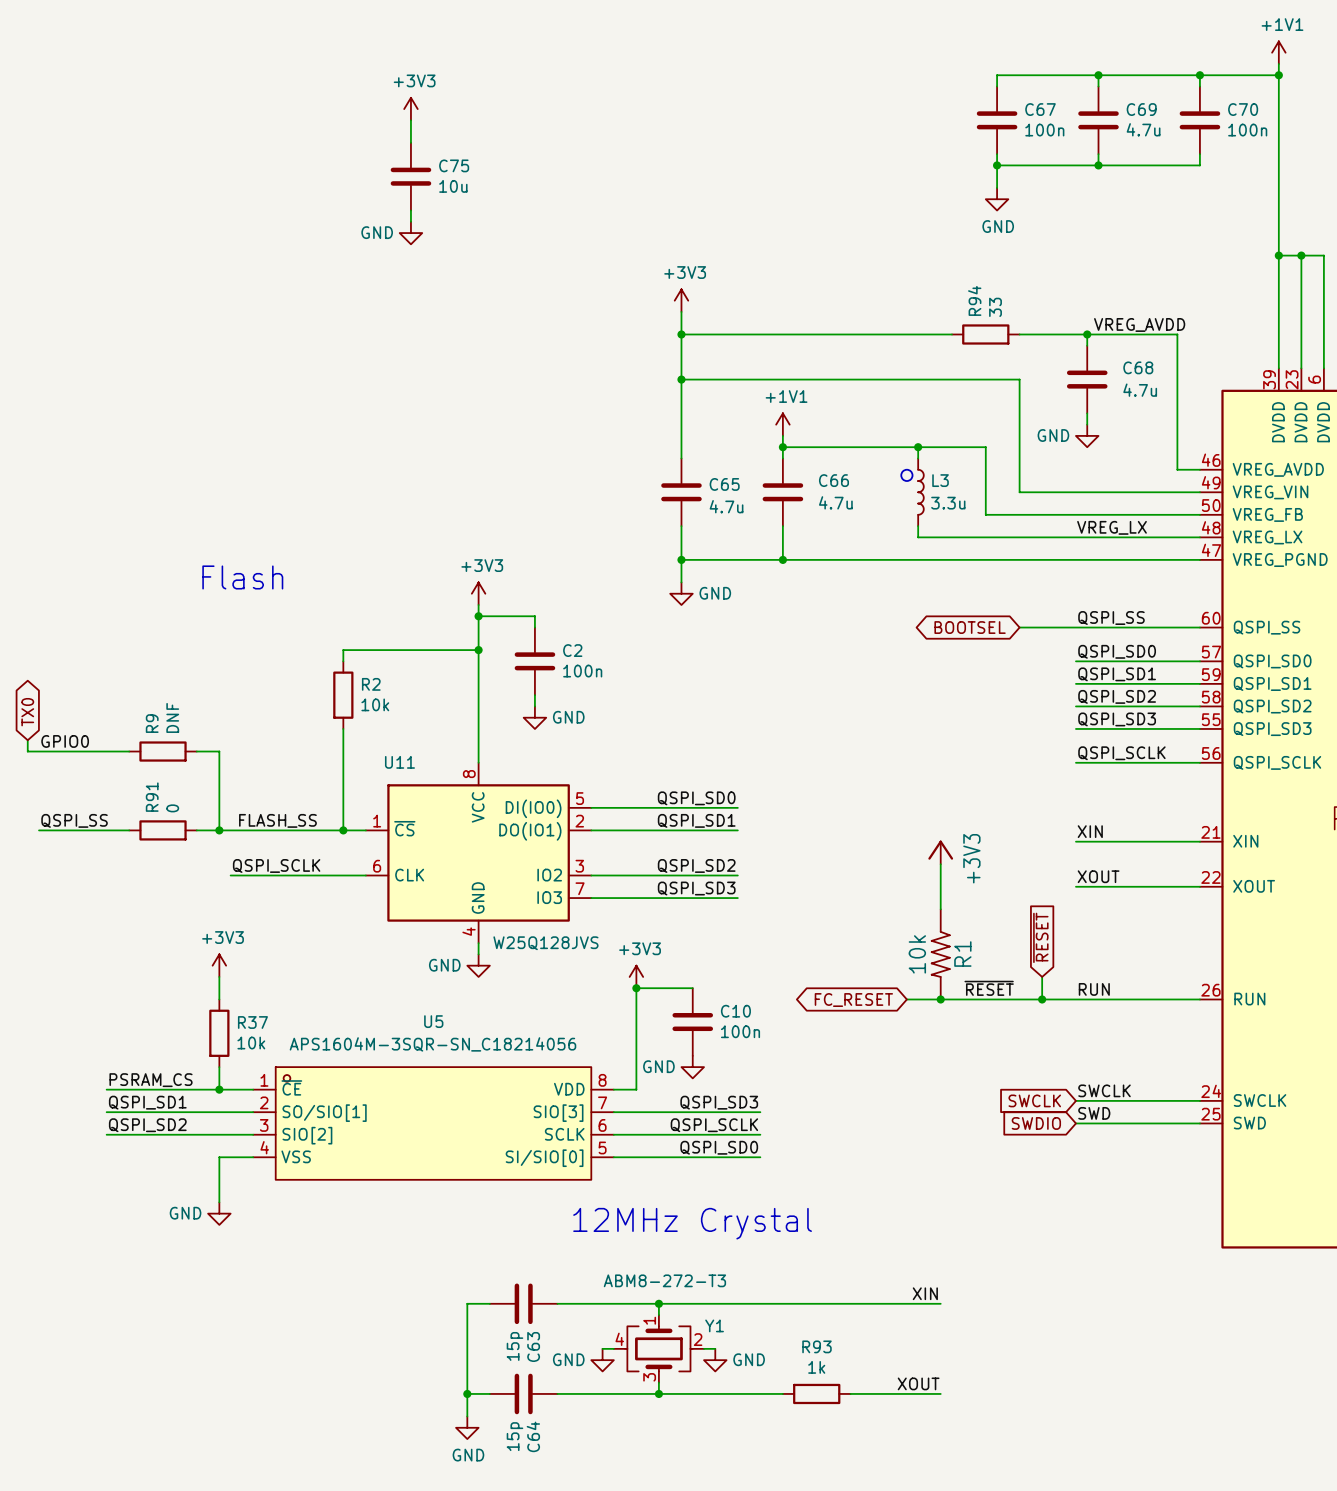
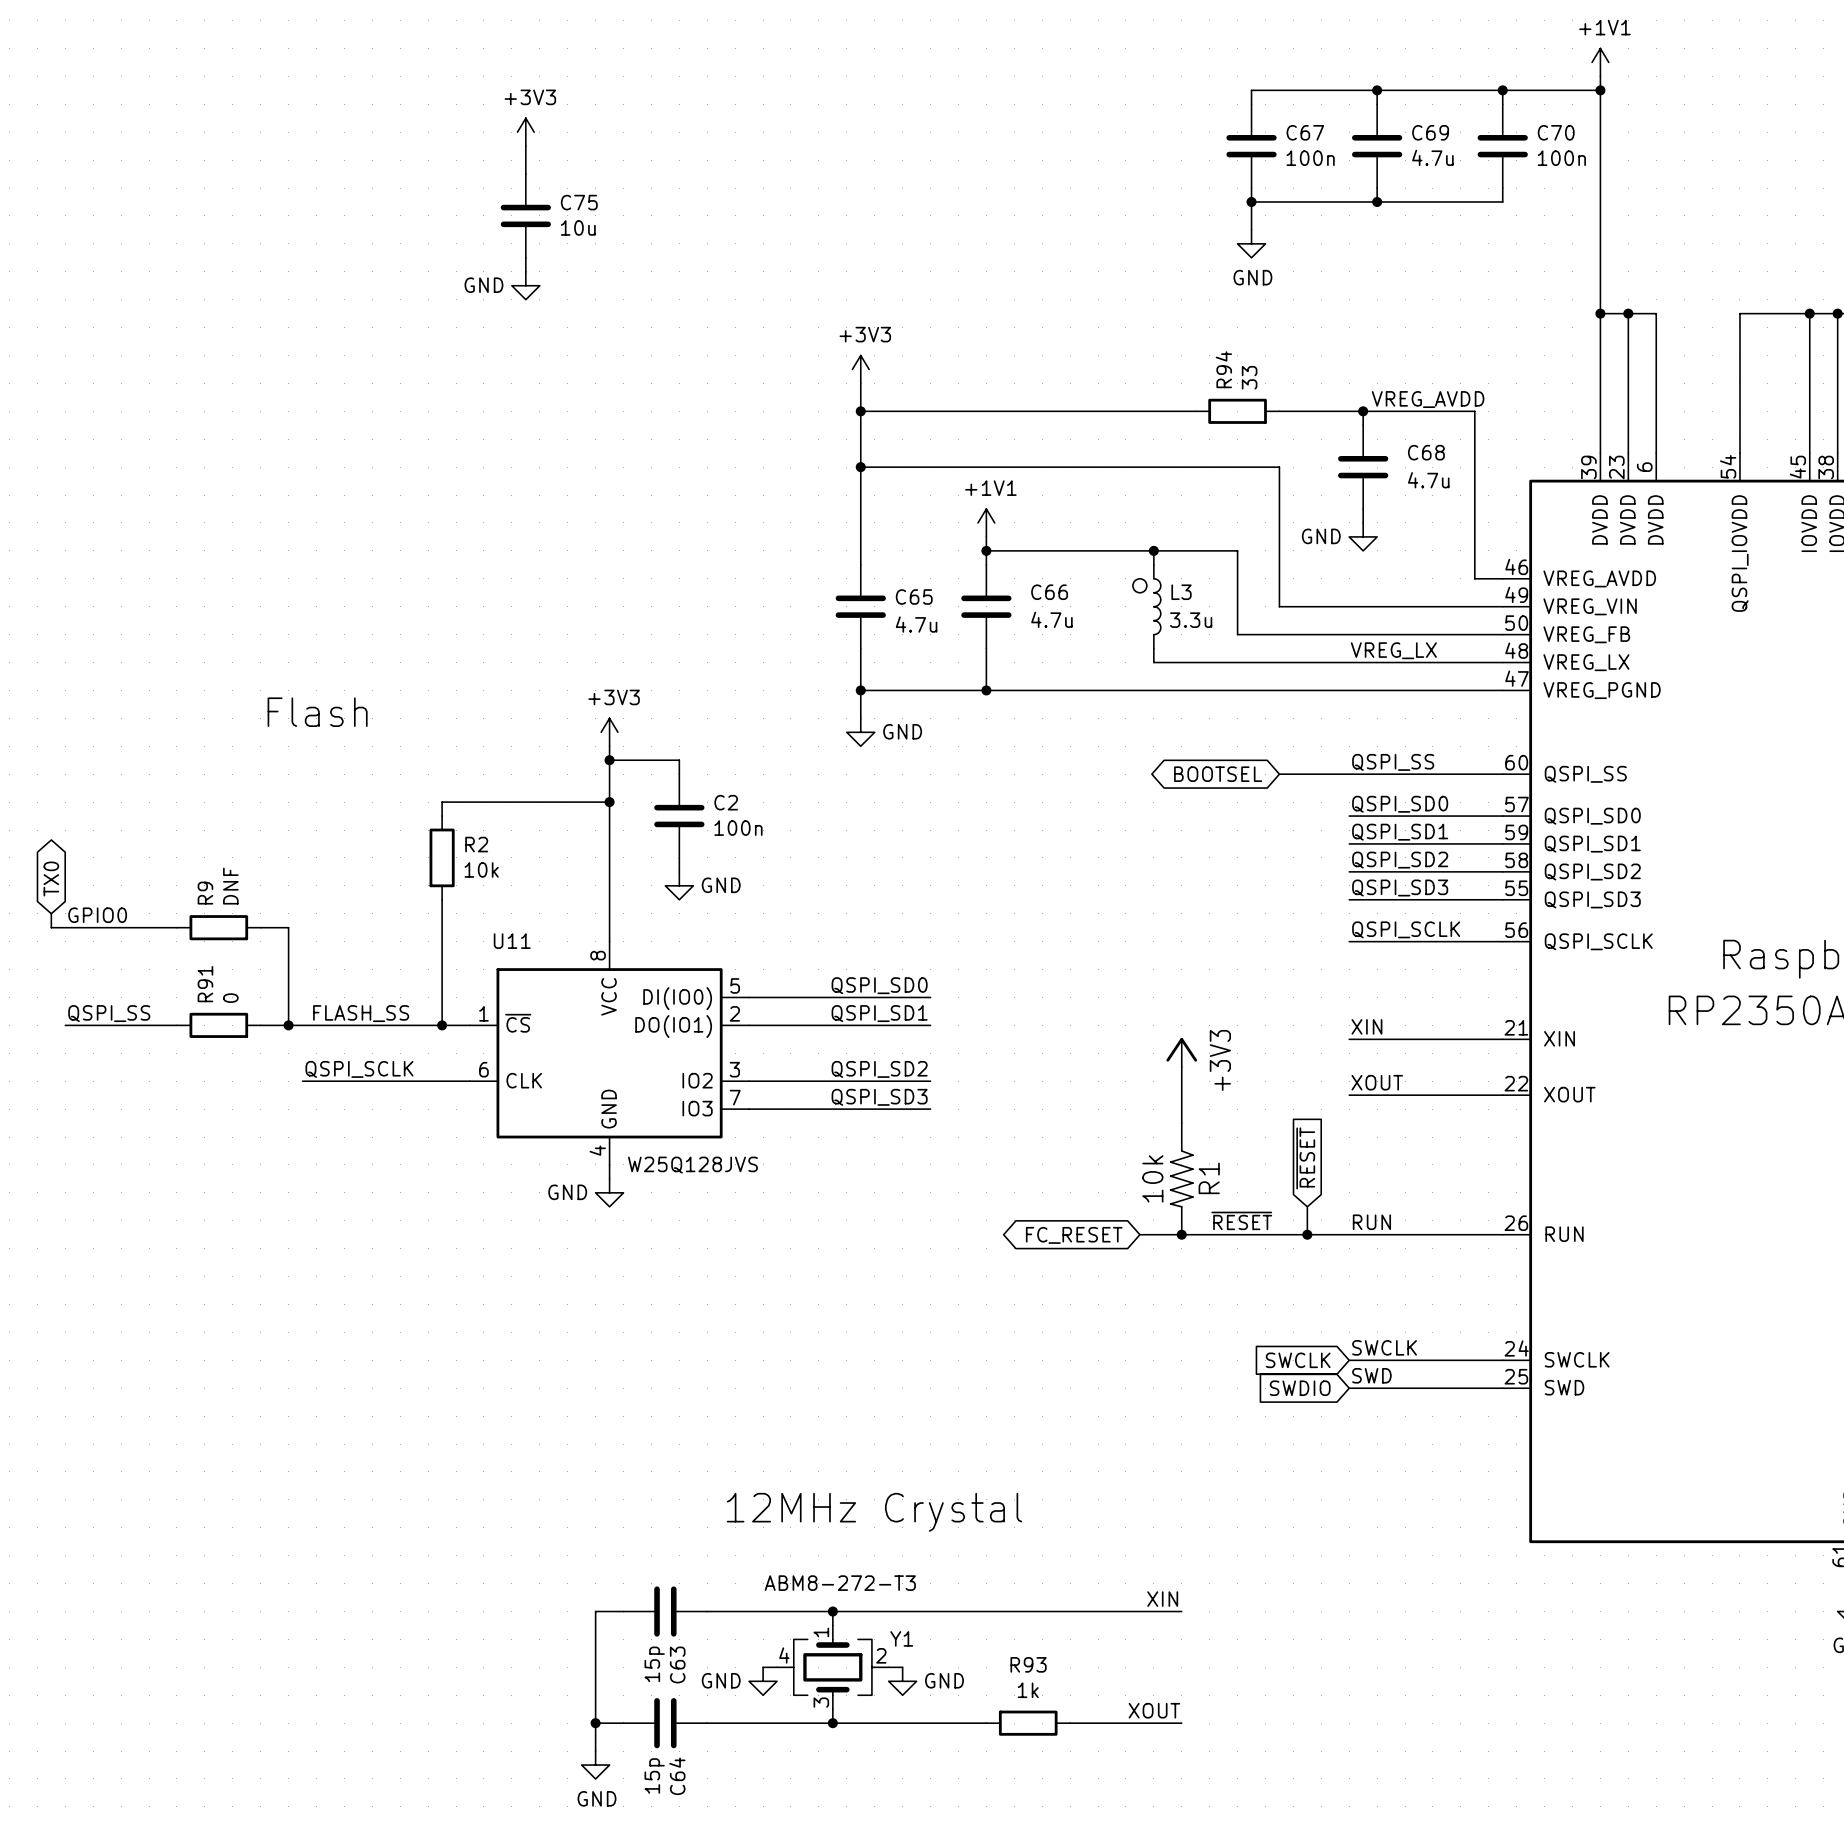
power symbol: +3V3 (219, 965) -> none
wire: (219, 976) (219, 999) -> none
power symbol: +3V3 (636, 976) -> none
junction: (636, 988) -> none
wire: (692, 988) (636, 988) (636, 1089) (613, 1089) -> none
C10: 100n (692, 1022) -> none
R37: 10k (219, 1033) -> none
wire: (219, 1067) (219, 1089) -> none
power symbol: GND (692, 1067) -> none
label: PSRAM_CS (151, 1080) -> none
wire: (106, 1089) (253, 1089) -> none
junction: (219, 1089) -> none
label: QSPI_SD1 (147, 1102) -> none
label: QSPI_SD3 (719, 1102) -> none
wire: (106, 1112) (253, 1112) -> none
wire: (613, 1112) (760, 1112) -> none
U5: APS1604M-3SQR-SN_C18214056 (433, 1123) -> none
label: QSPI_SD2 (147, 1125) -> none
label: QSPI_SCLK (714, 1125) -> none
wire: (106, 1134) (253, 1134) -> none
wire: (613, 1134) (760, 1134) -> none
label: QSPI_SD0 (719, 1147) -> none
wire: (253, 1157) (219, 1157) (219, 1202) -> none
wire: (613, 1157) (760, 1157) -> none
power symbol: GND (219, 1213) -> none

